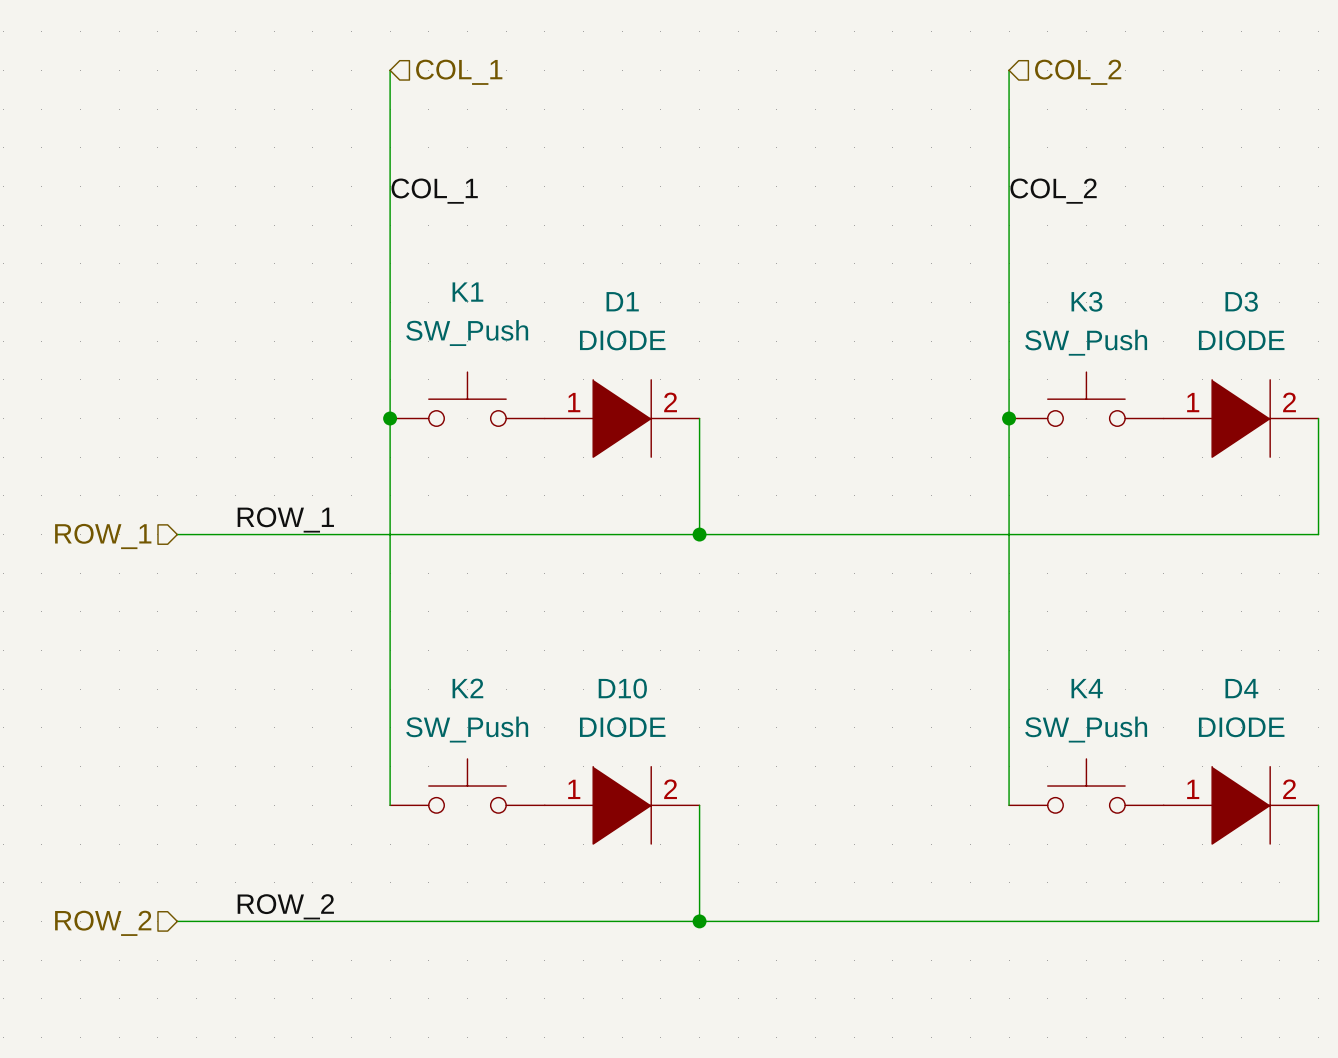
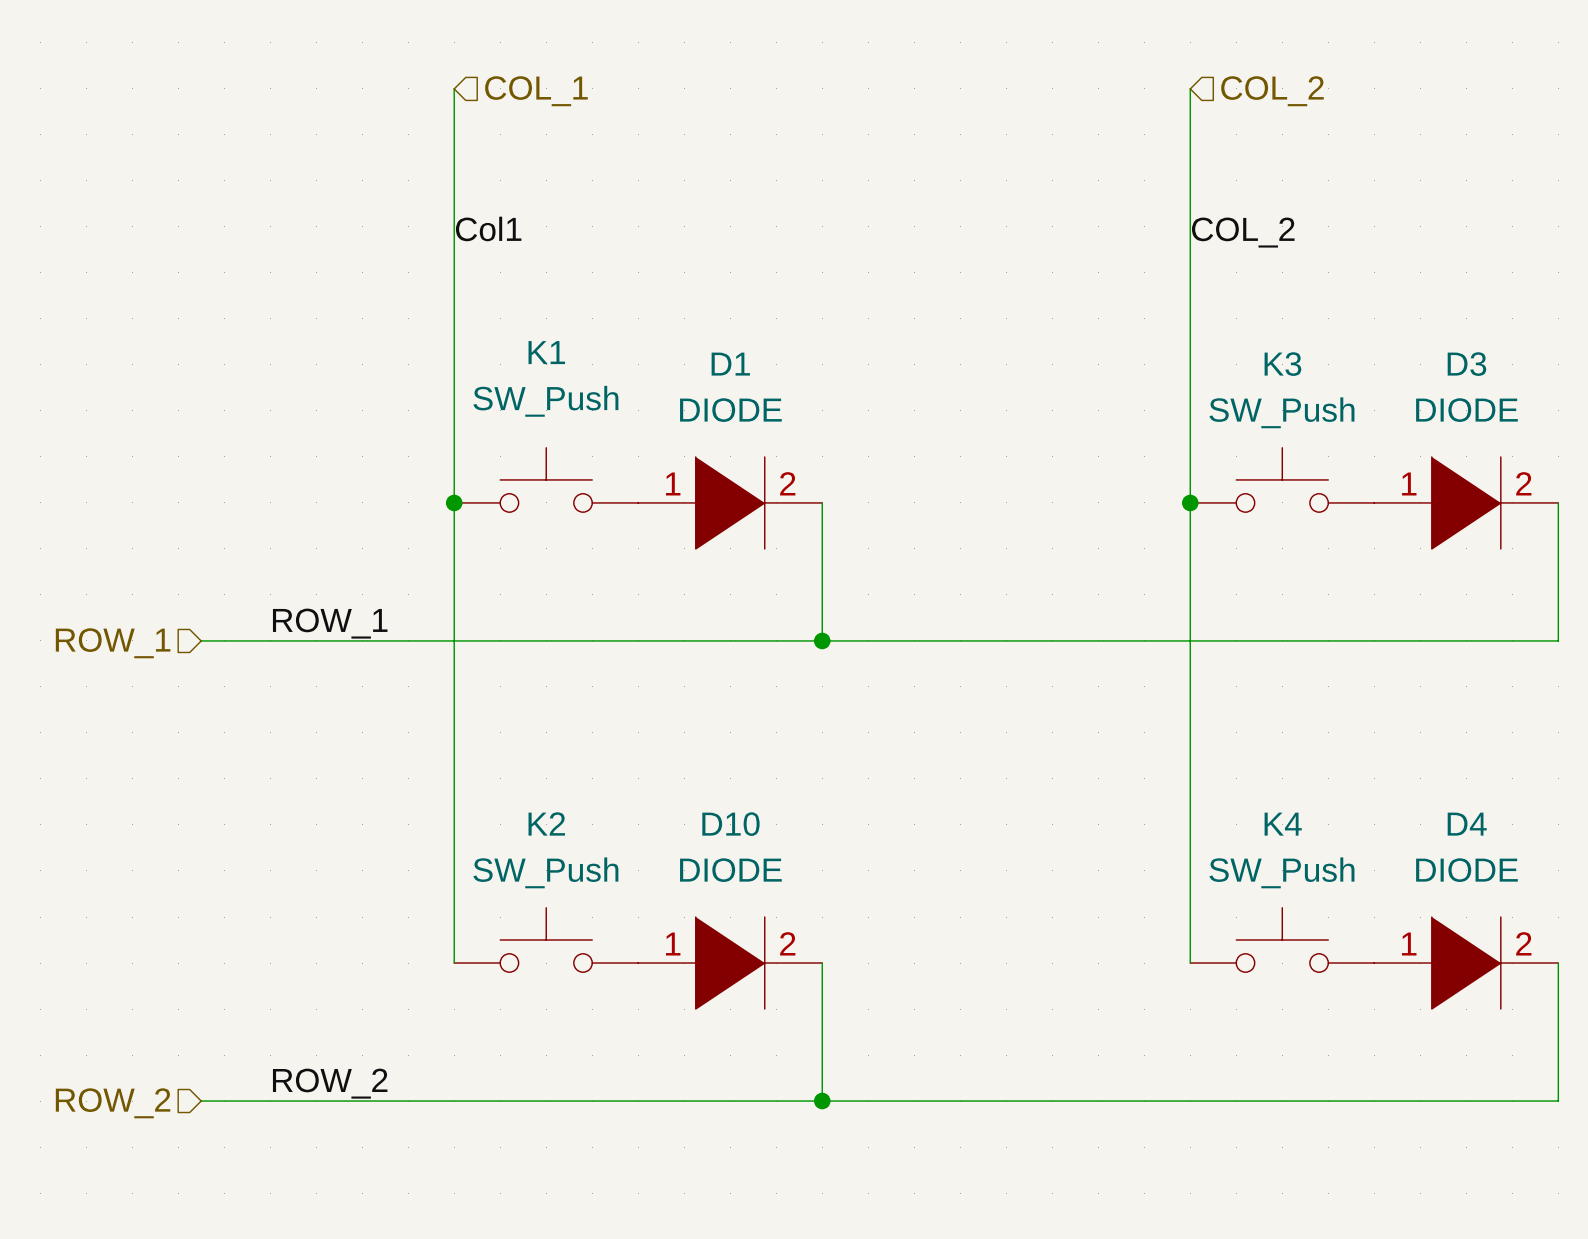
label: COL_1 (434, 191) -> Col1 (488, 228)

